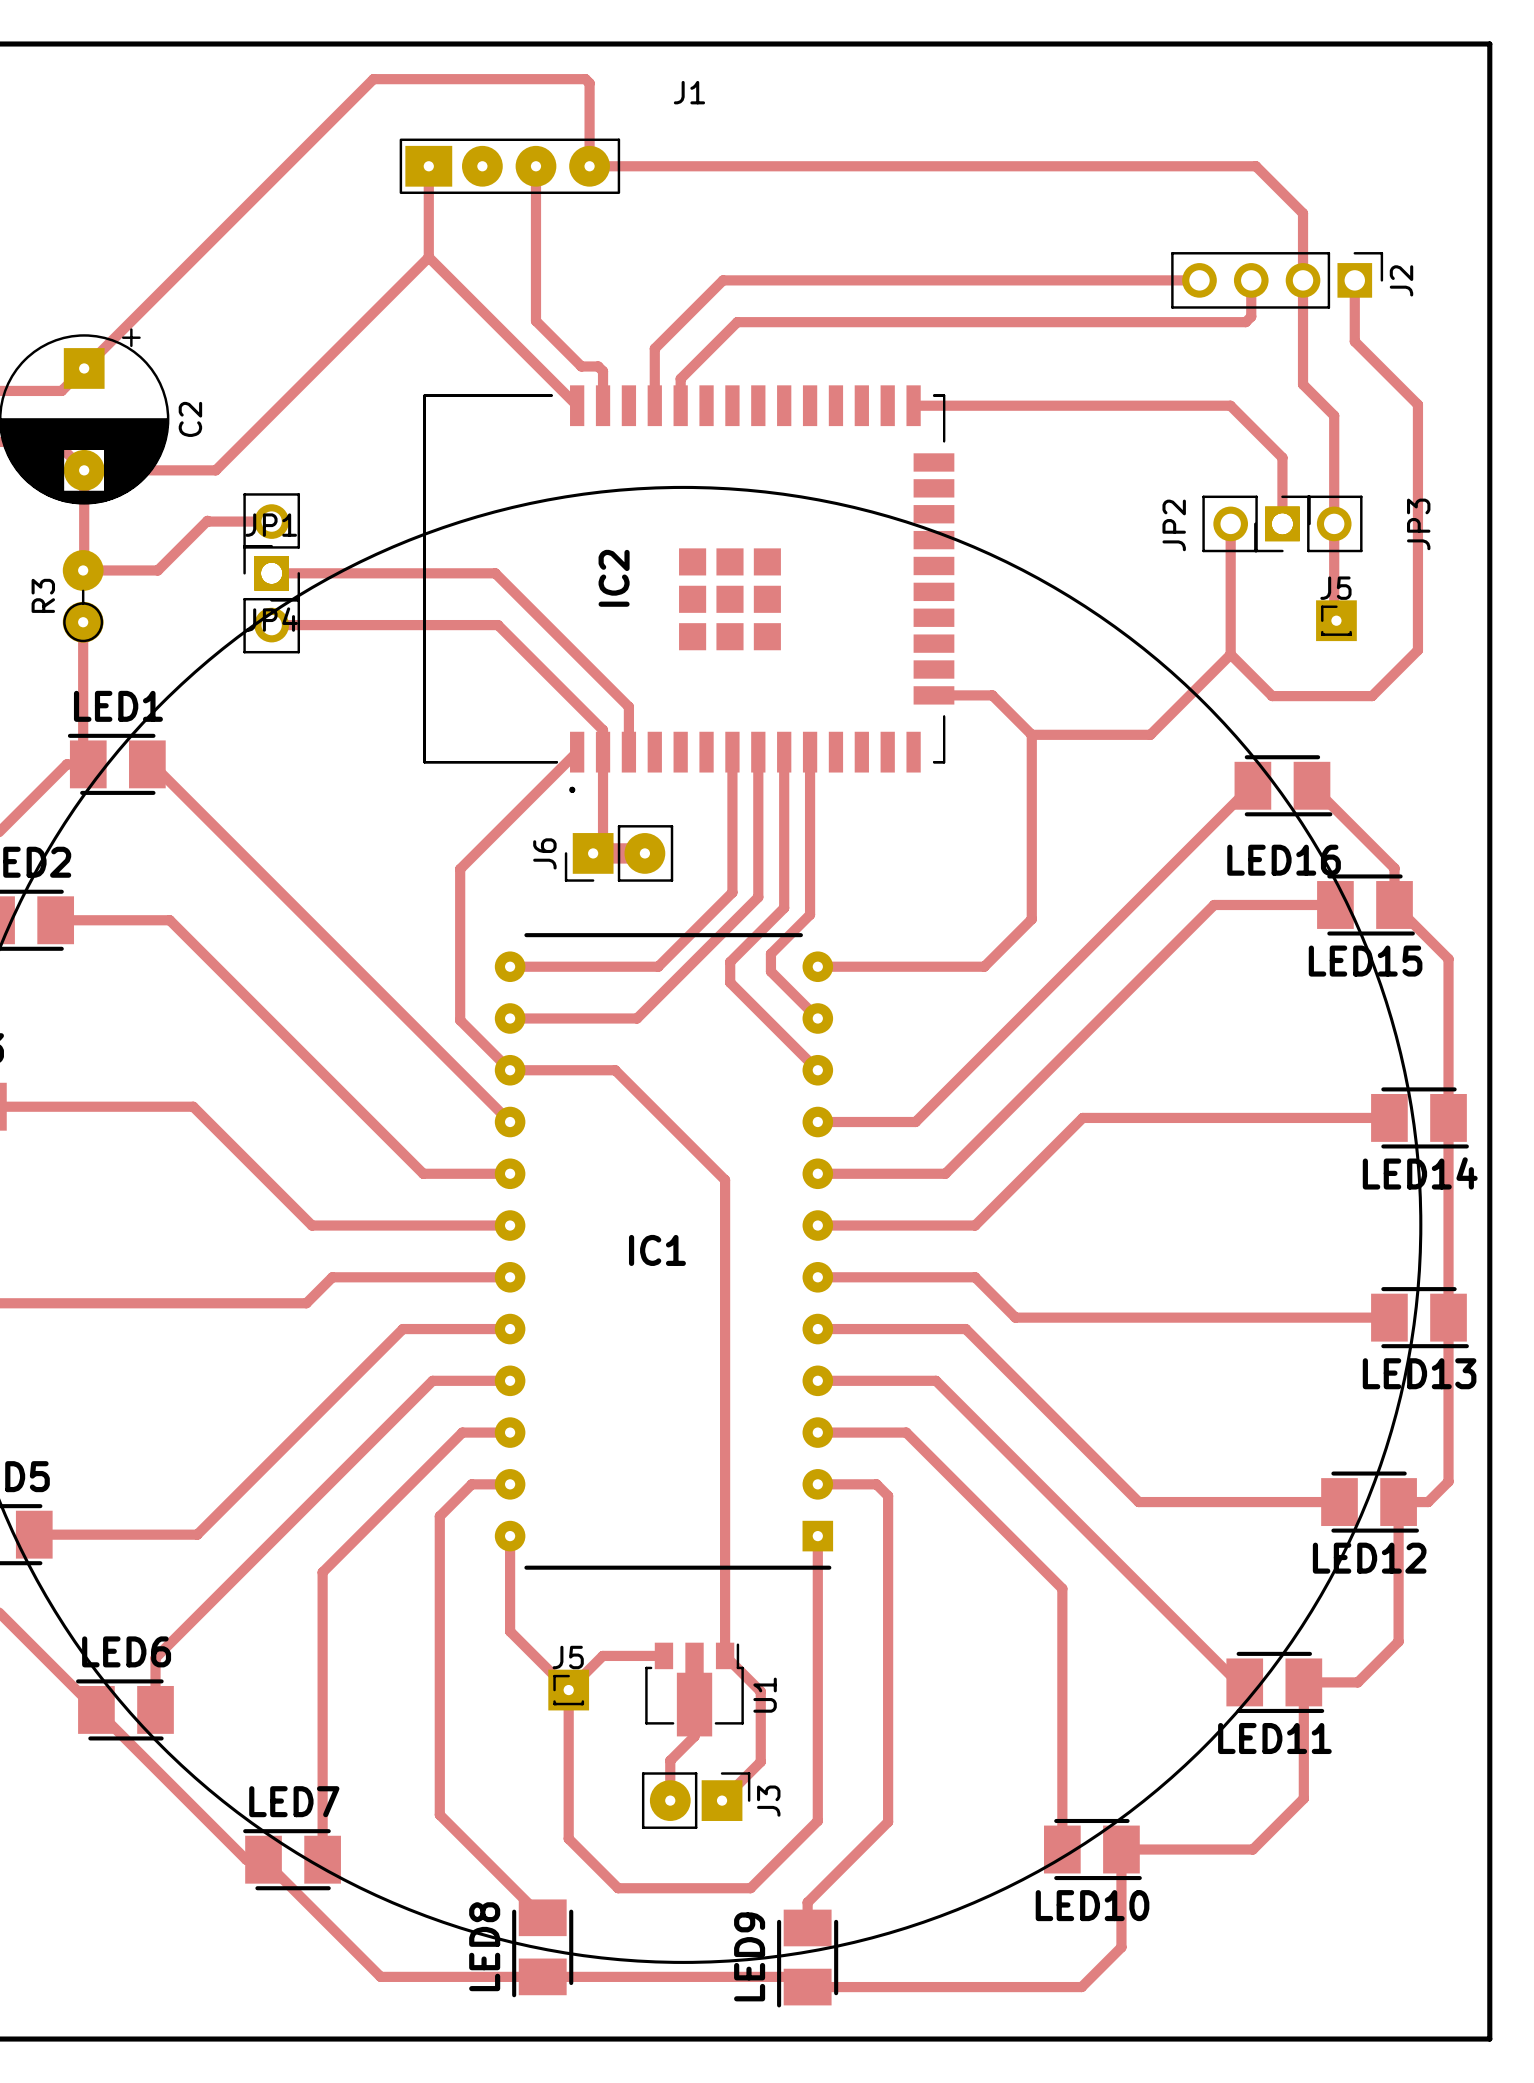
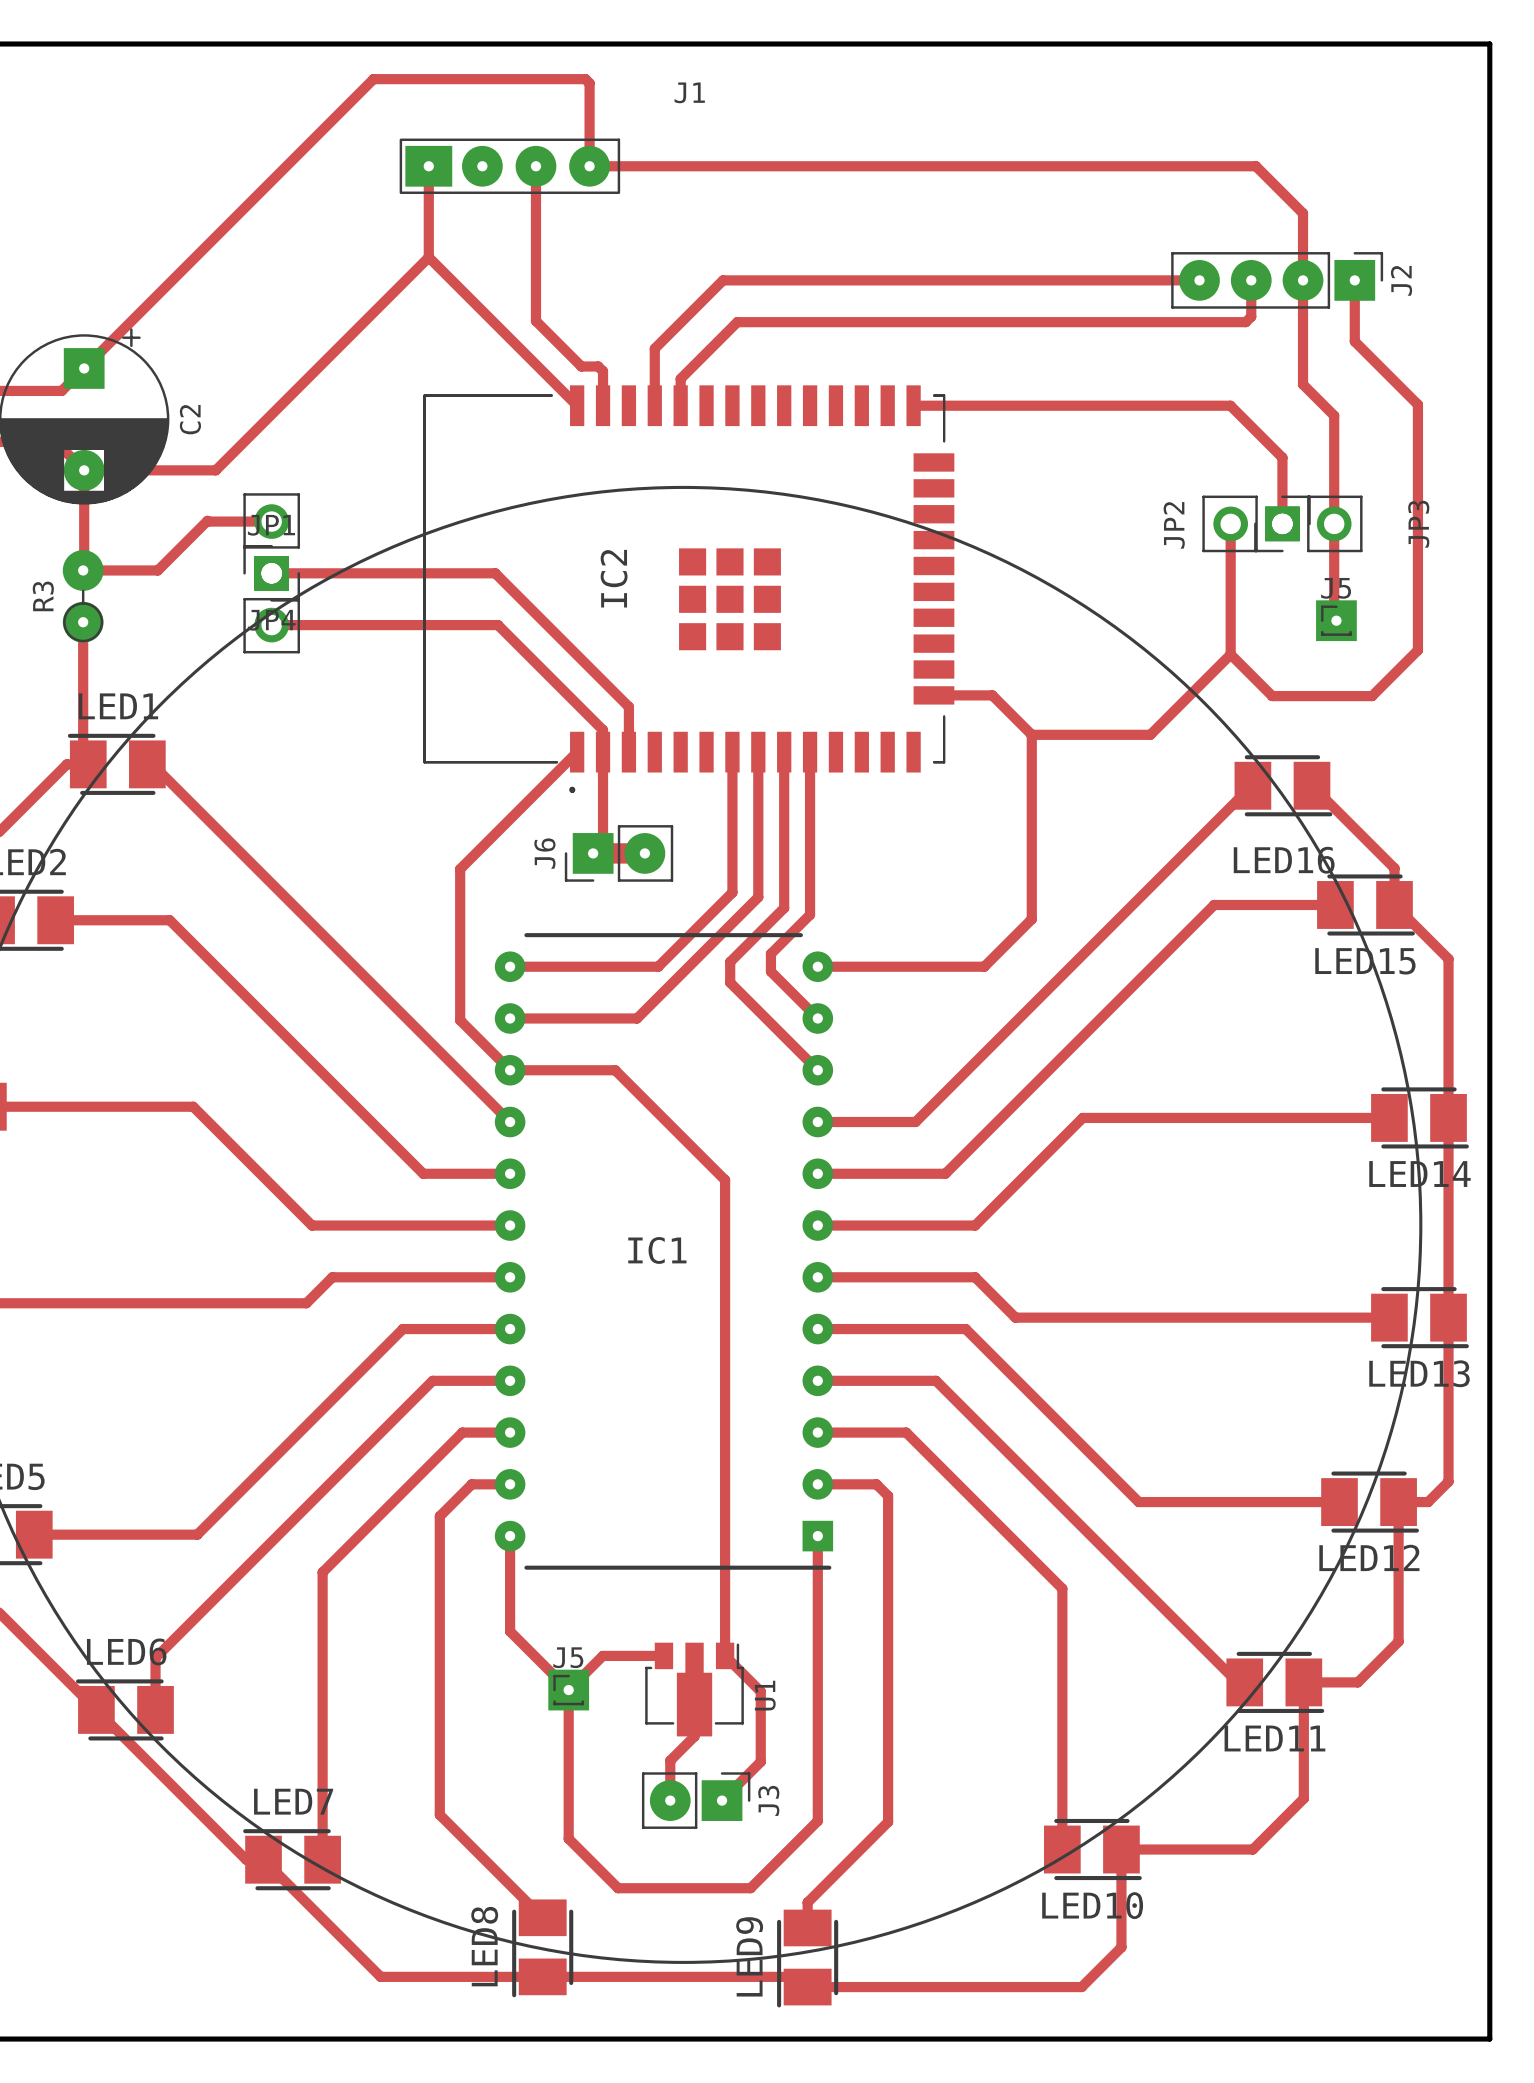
J2 footprint: [1171, 252, 1384, 309] -> [1171, 252, 1384, 309]

